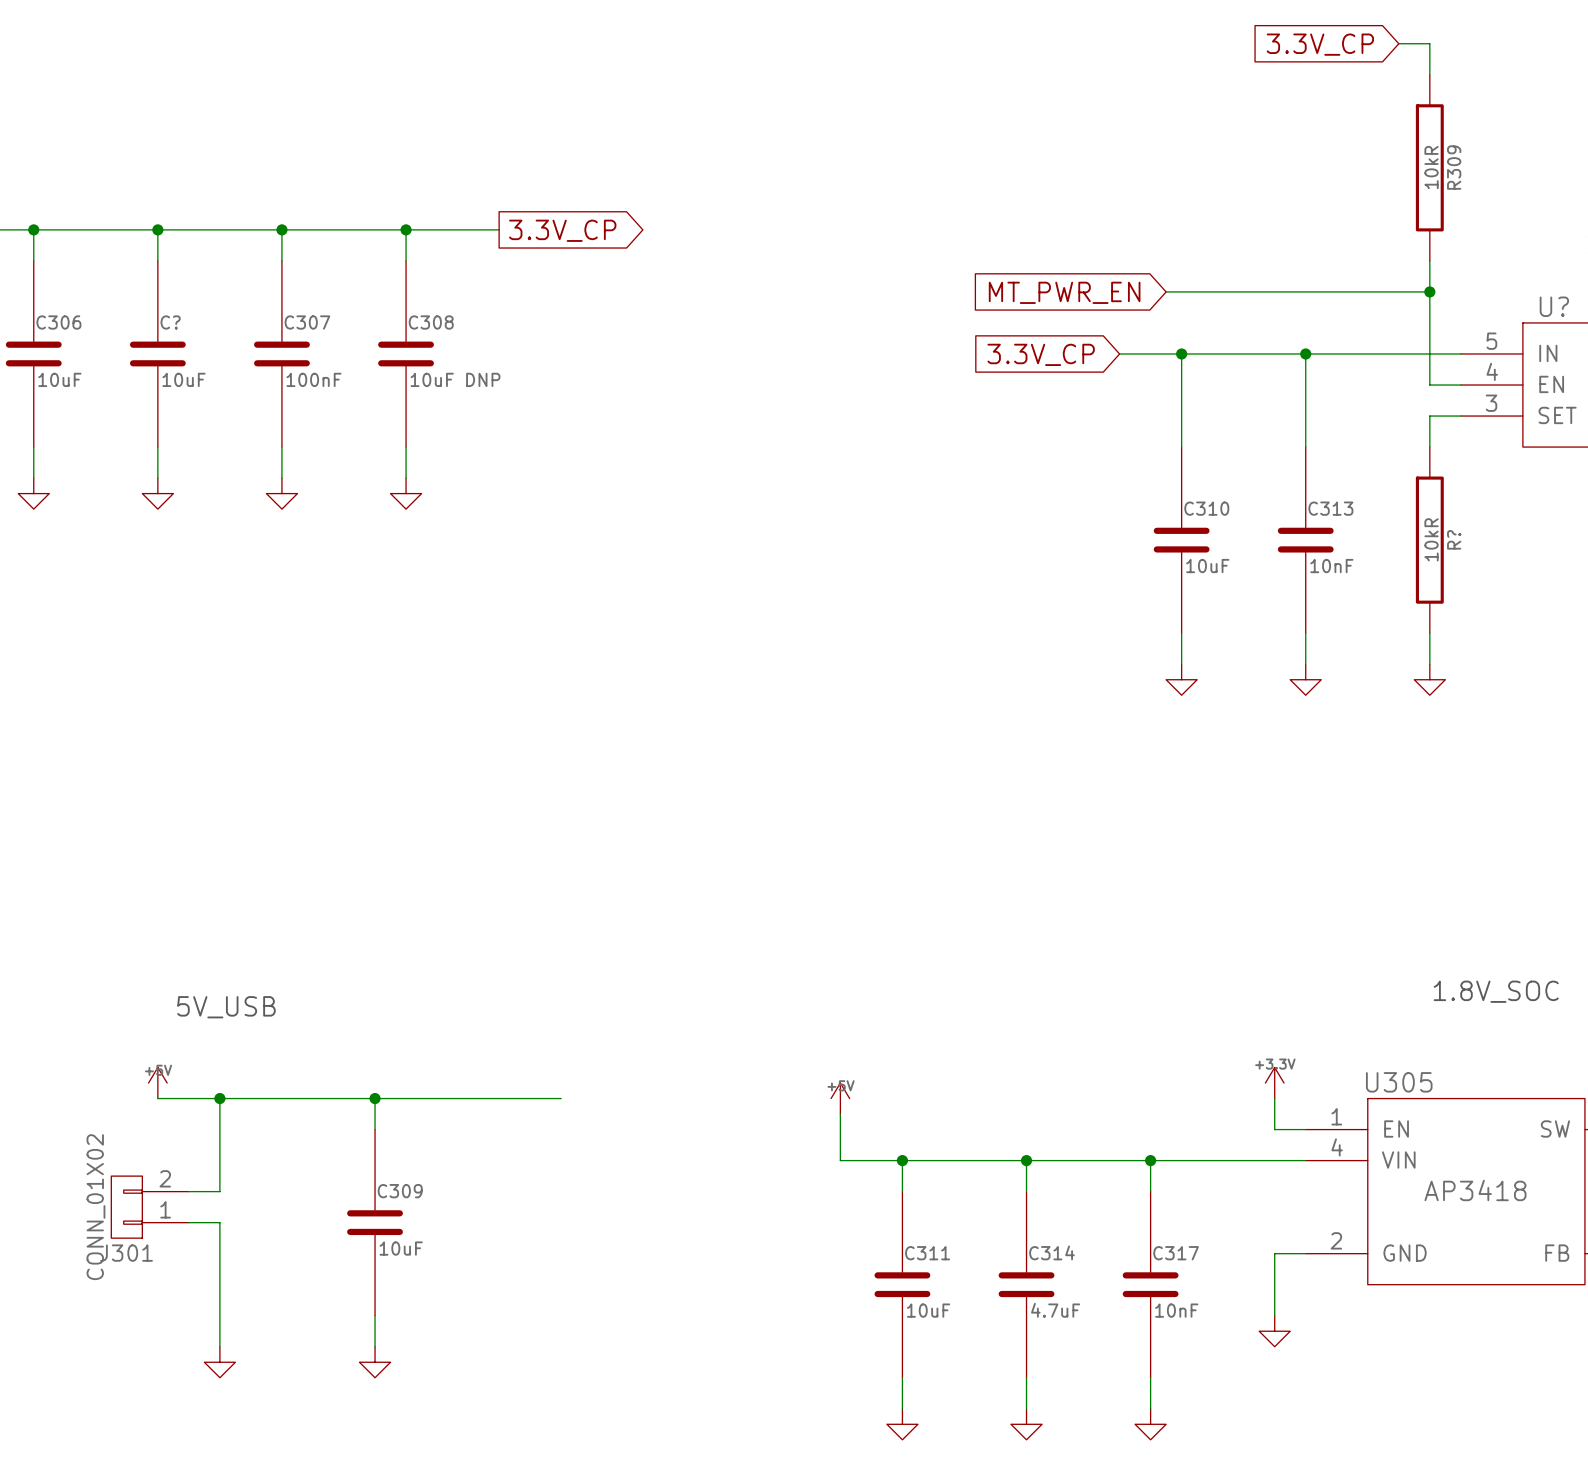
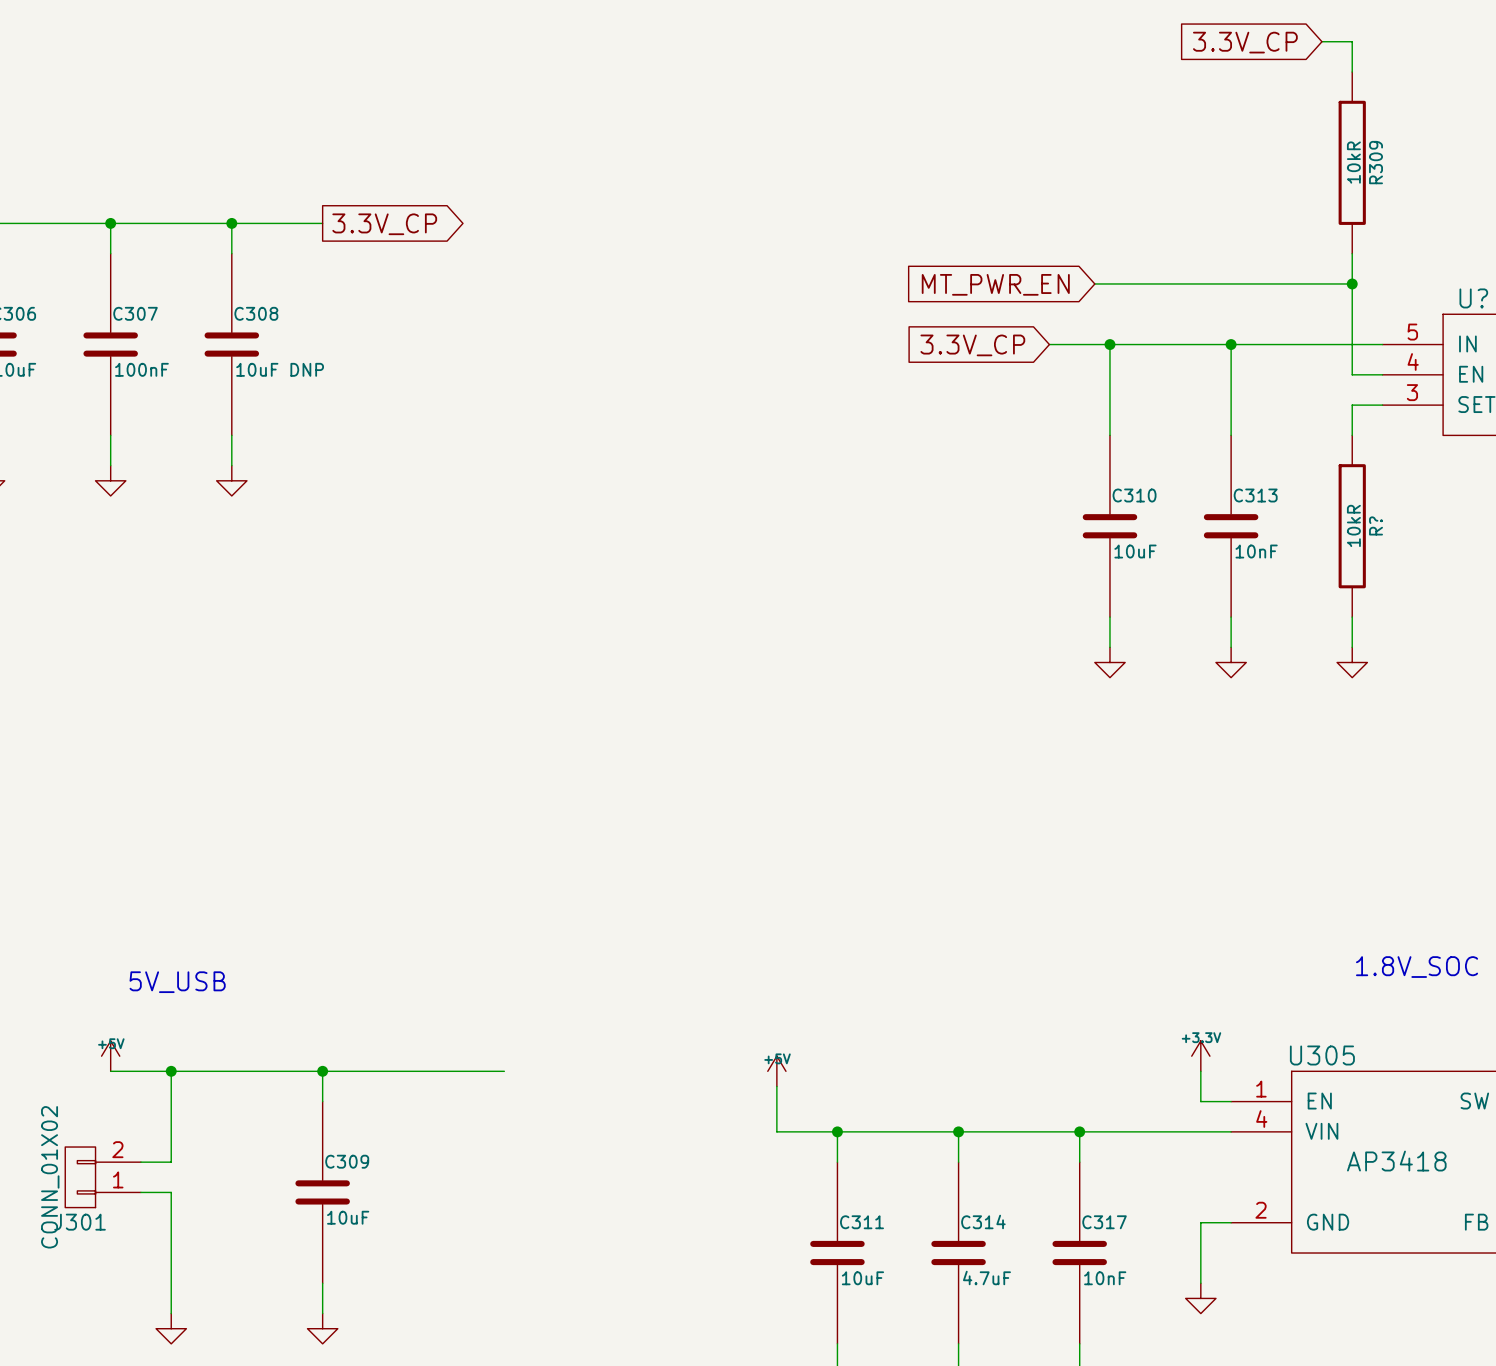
wire: (375, 229) (499, 229) -> none
wire: (406, 229) (406, 260) -> none
junction: (406, 229) -> none
global label position: 3.3V_CP (562, 230) -> 3.3V_CP (384, 224)
C? name: C? (170, 322) -> C307 (135, 313)
C307 name: C307 (307, 322) -> C308 (256, 313)
C308: 10uF DNP (406, 353) -> none
C? value: 10uF (183, 379) -> 100nF (141, 369)
C307 value: 100nF (313, 379) -> 10uF DNP (280, 369)
wire: (406, 447) (406, 478) -> none
power symbol: (406, 493) -> none

